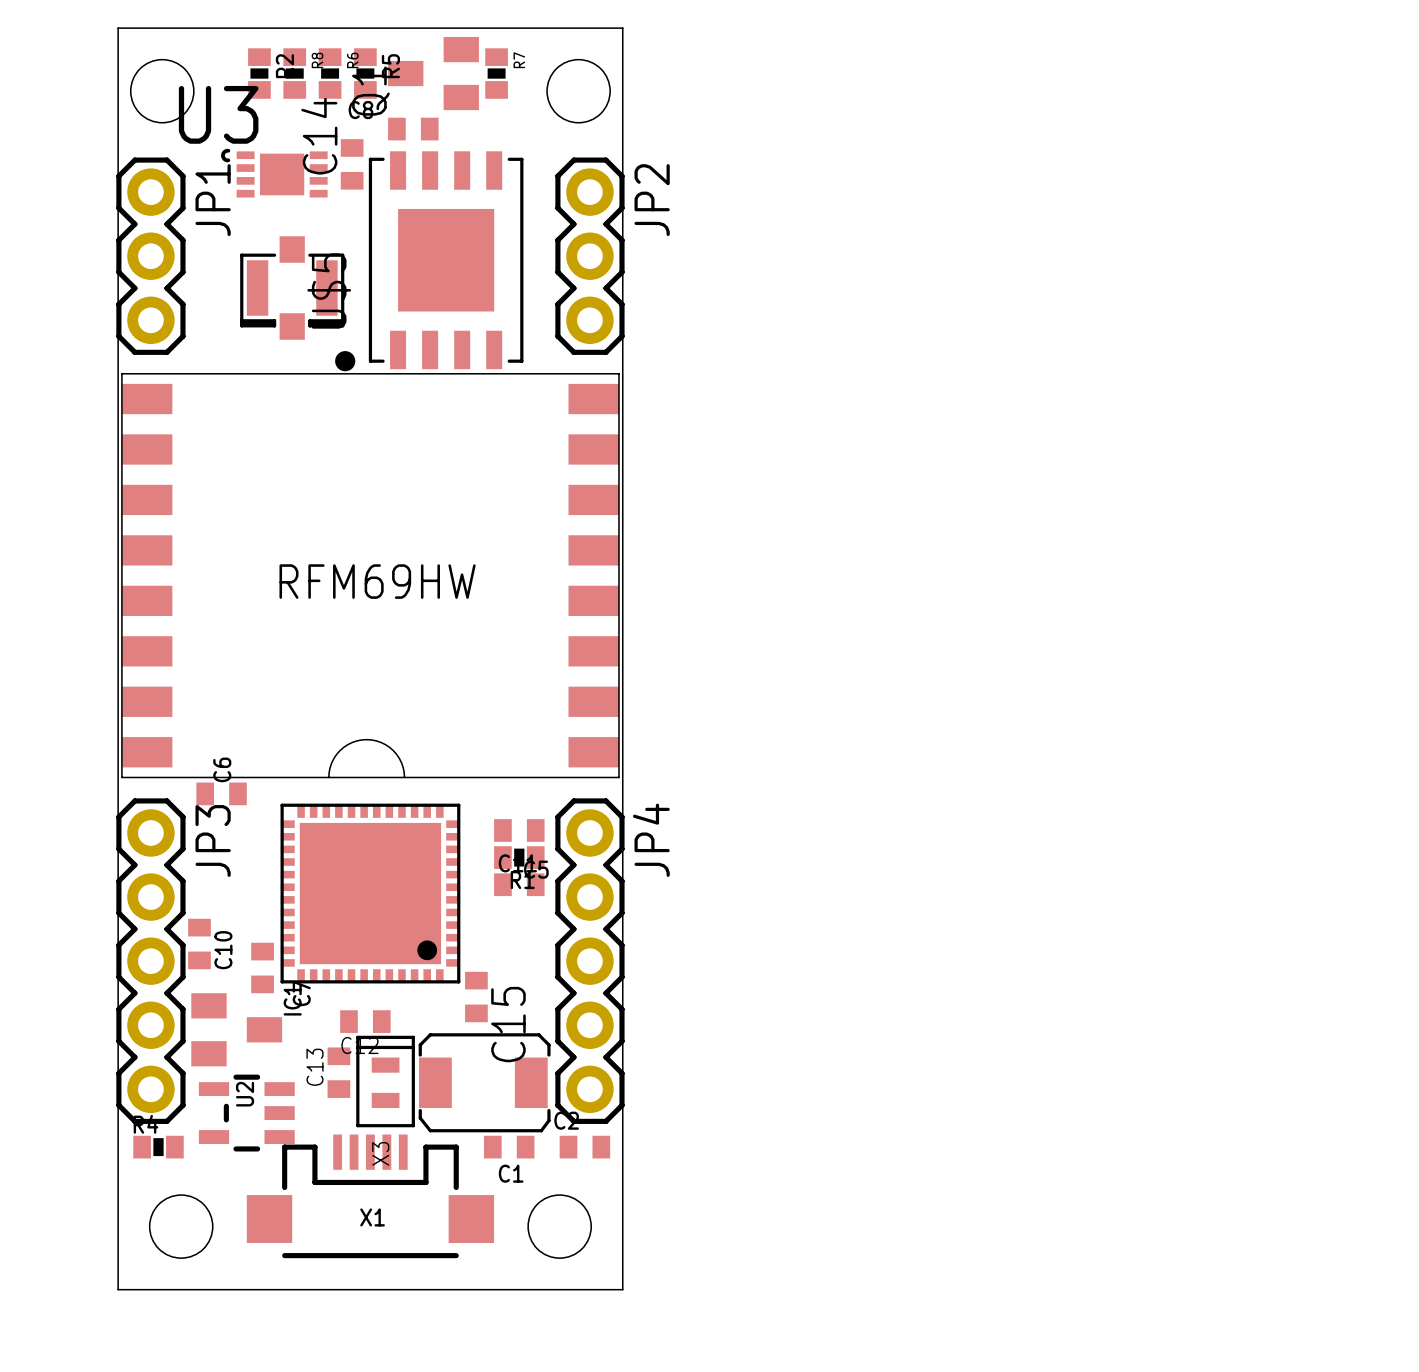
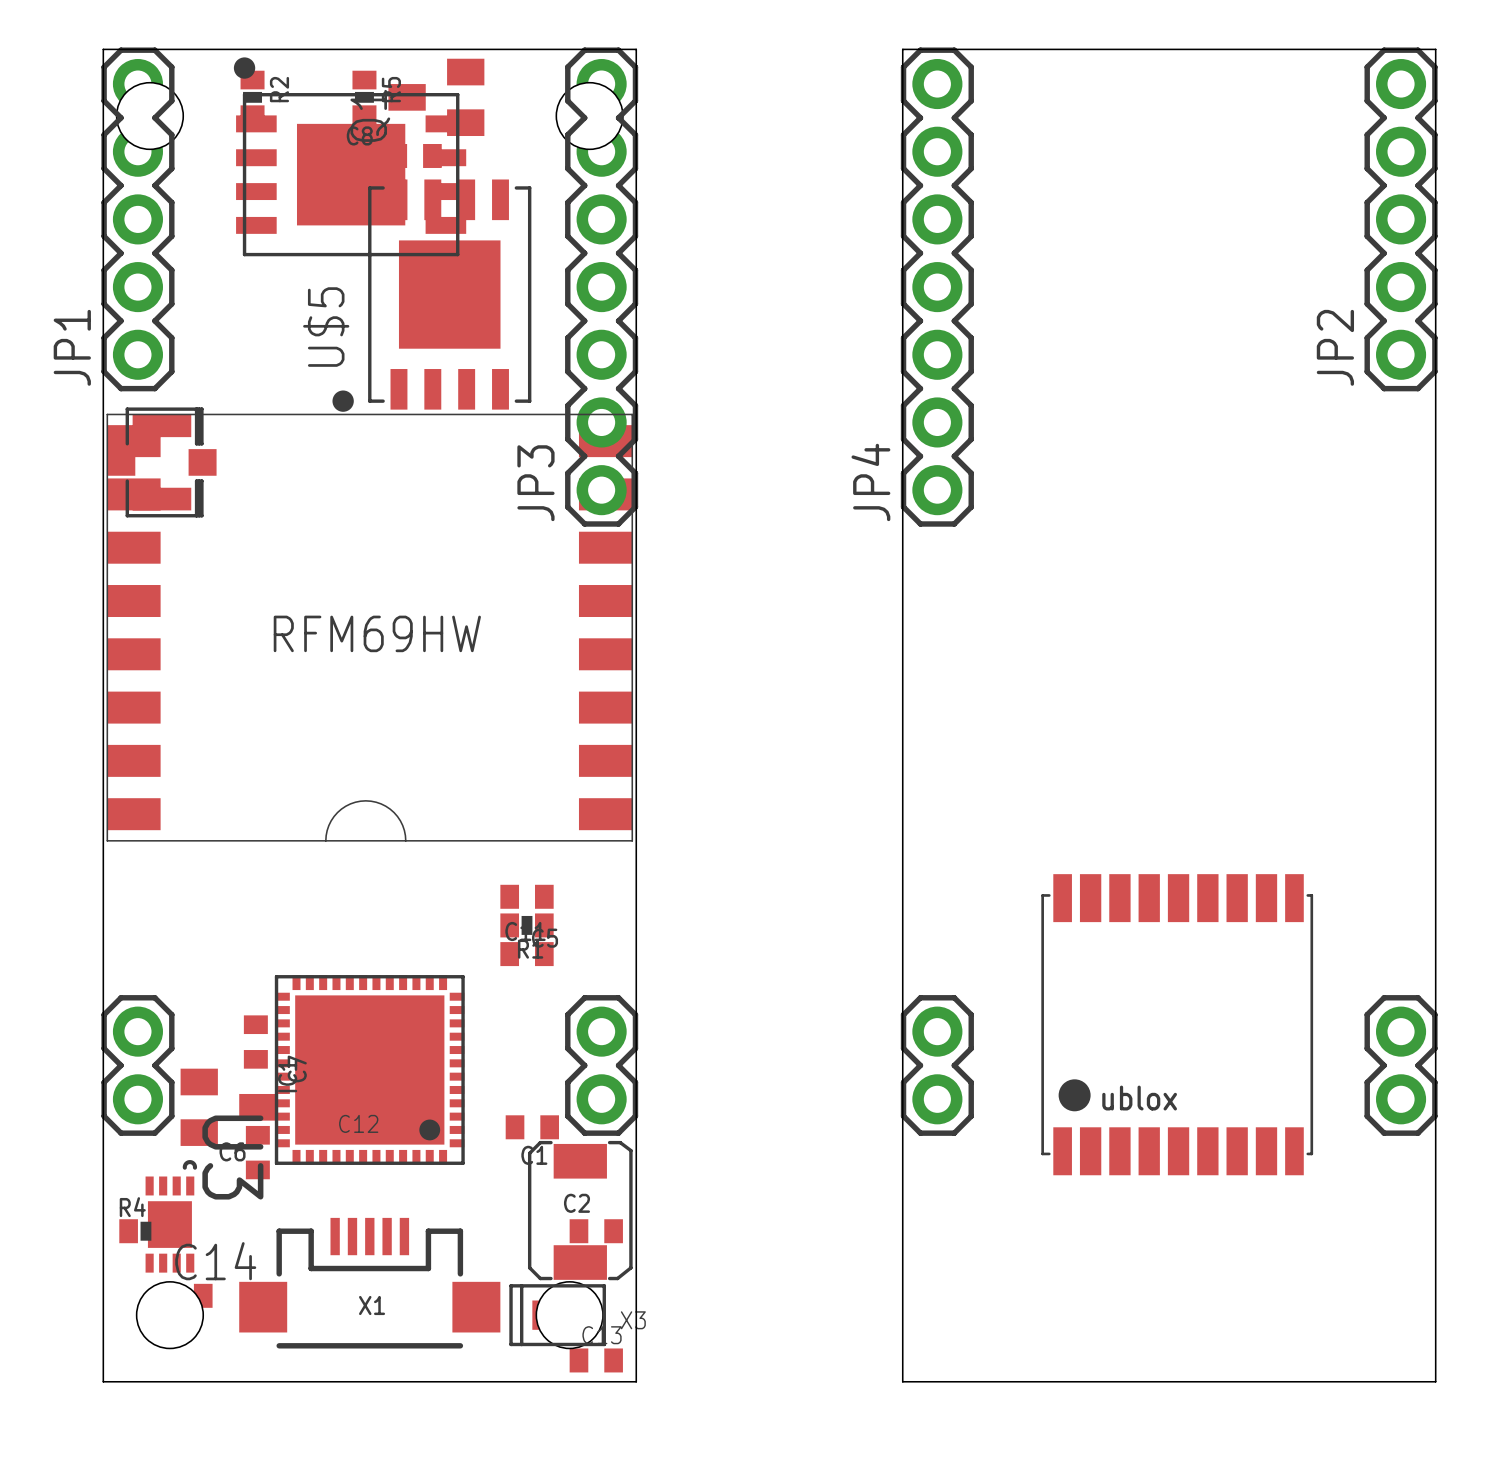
board edge: none -> (902, 49) (1435, 49) (1435, 1381) (902, 1381) (902, 49)
R8: (294, 73) -> none
R6: (330, 73) -> none
R7: (496, 73) -> none
part: none -> (350, 156)
JP1 footprint: [116, 157, 186, 355] -> [101, 47, 175, 392]
JP2 footprint: [555, 157, 625, 355] -> [1364, 47, 1438, 392]
C14 rotation: 0° (352, 164) -> 90° clockwise (185, 1295)
C14 position: (352, 164) -> (185, 1295)
U3 rotation: 0° (274, 173) -> 90° clockwise (171, 1216)
U3 position: (274, 173) -> (171, 1216)
JP1 name position: JP1 (213, 200) -> JP1 (72, 347)
JP2 name position: JP2 (652, 200) -> JP2 (1335, 347)
part rotation: 0° (292, 288) -> 90° counterclockwise (161, 462)
part position: (292, 288) -> (161, 462)
C6 rotation: 0° (221, 793) -> 90° clockwise (257, 1152)
C6 position: (221, 793) -> (257, 1152)
JP3 footprint: [116, 798, 186, 1124] -> [565, 47, 639, 527]
JP4 footprint: [555, 798, 625, 1124] -> [900, 47, 974, 527]
JP3 name position: JP3 (213, 840) -> JP3 (535, 483)
JP4 name position: JP4 (651, 840) -> JP4 (870, 482)
part position: (370, 893) -> (369, 1070)
C10: (199, 944) -> none
part: none -> (1177, 1024)
part: none -> (137, 1065)
part: none -> (601, 1065)
part: none -> (937, 1065)
part: none -> (1401, 1065)
C15: (476, 996) -> none
C13 rotation: 0° (338, 1072) -> 90° clockwise (596, 1360)
C13 position: (338, 1072) -> (596, 1360)
X3 rotation: 0° (385, 1081) -> 90° counterclockwise (557, 1315)
X3 position: (385, 1081) -> (557, 1315)
part rotation: 0° (484, 1082) -> 90° counterclockwise (580, 1210)
part position: (484, 1082) -> (580, 1210)
U2: (246, 1113) -> none
C1 position: (509, 1147) -> (532, 1127)

